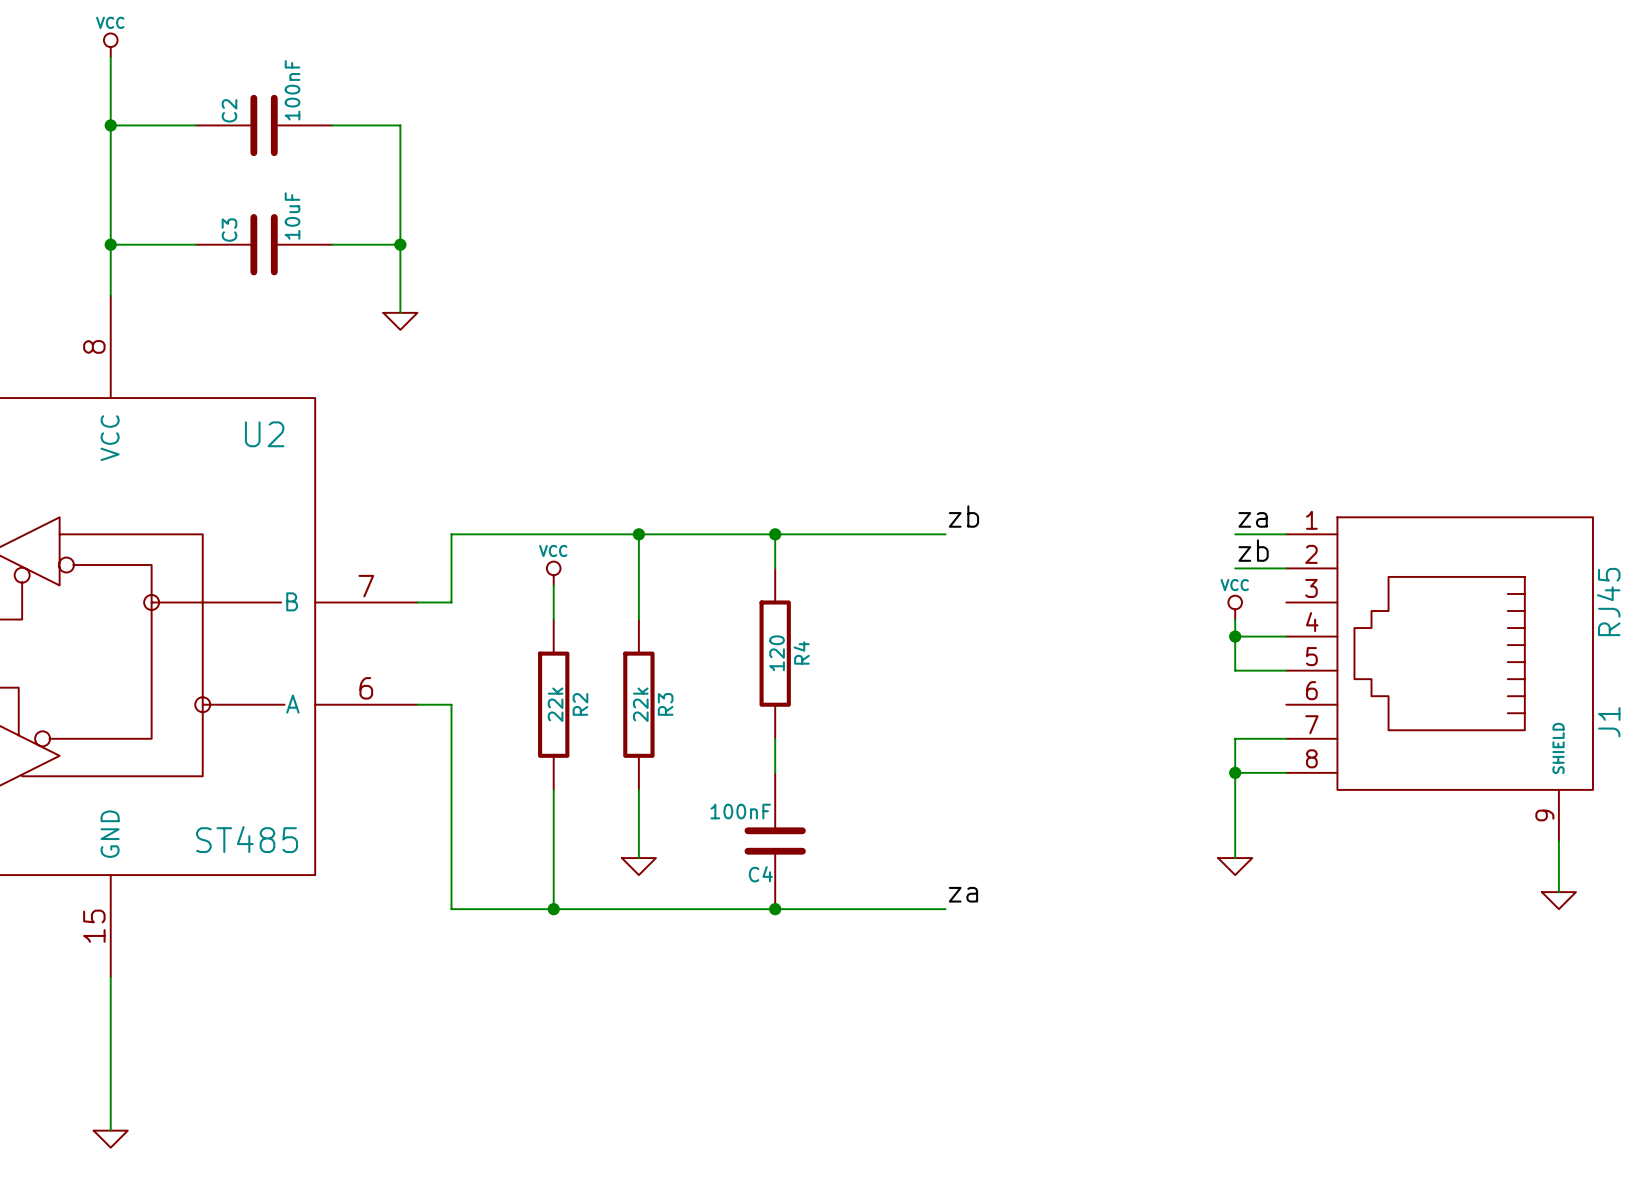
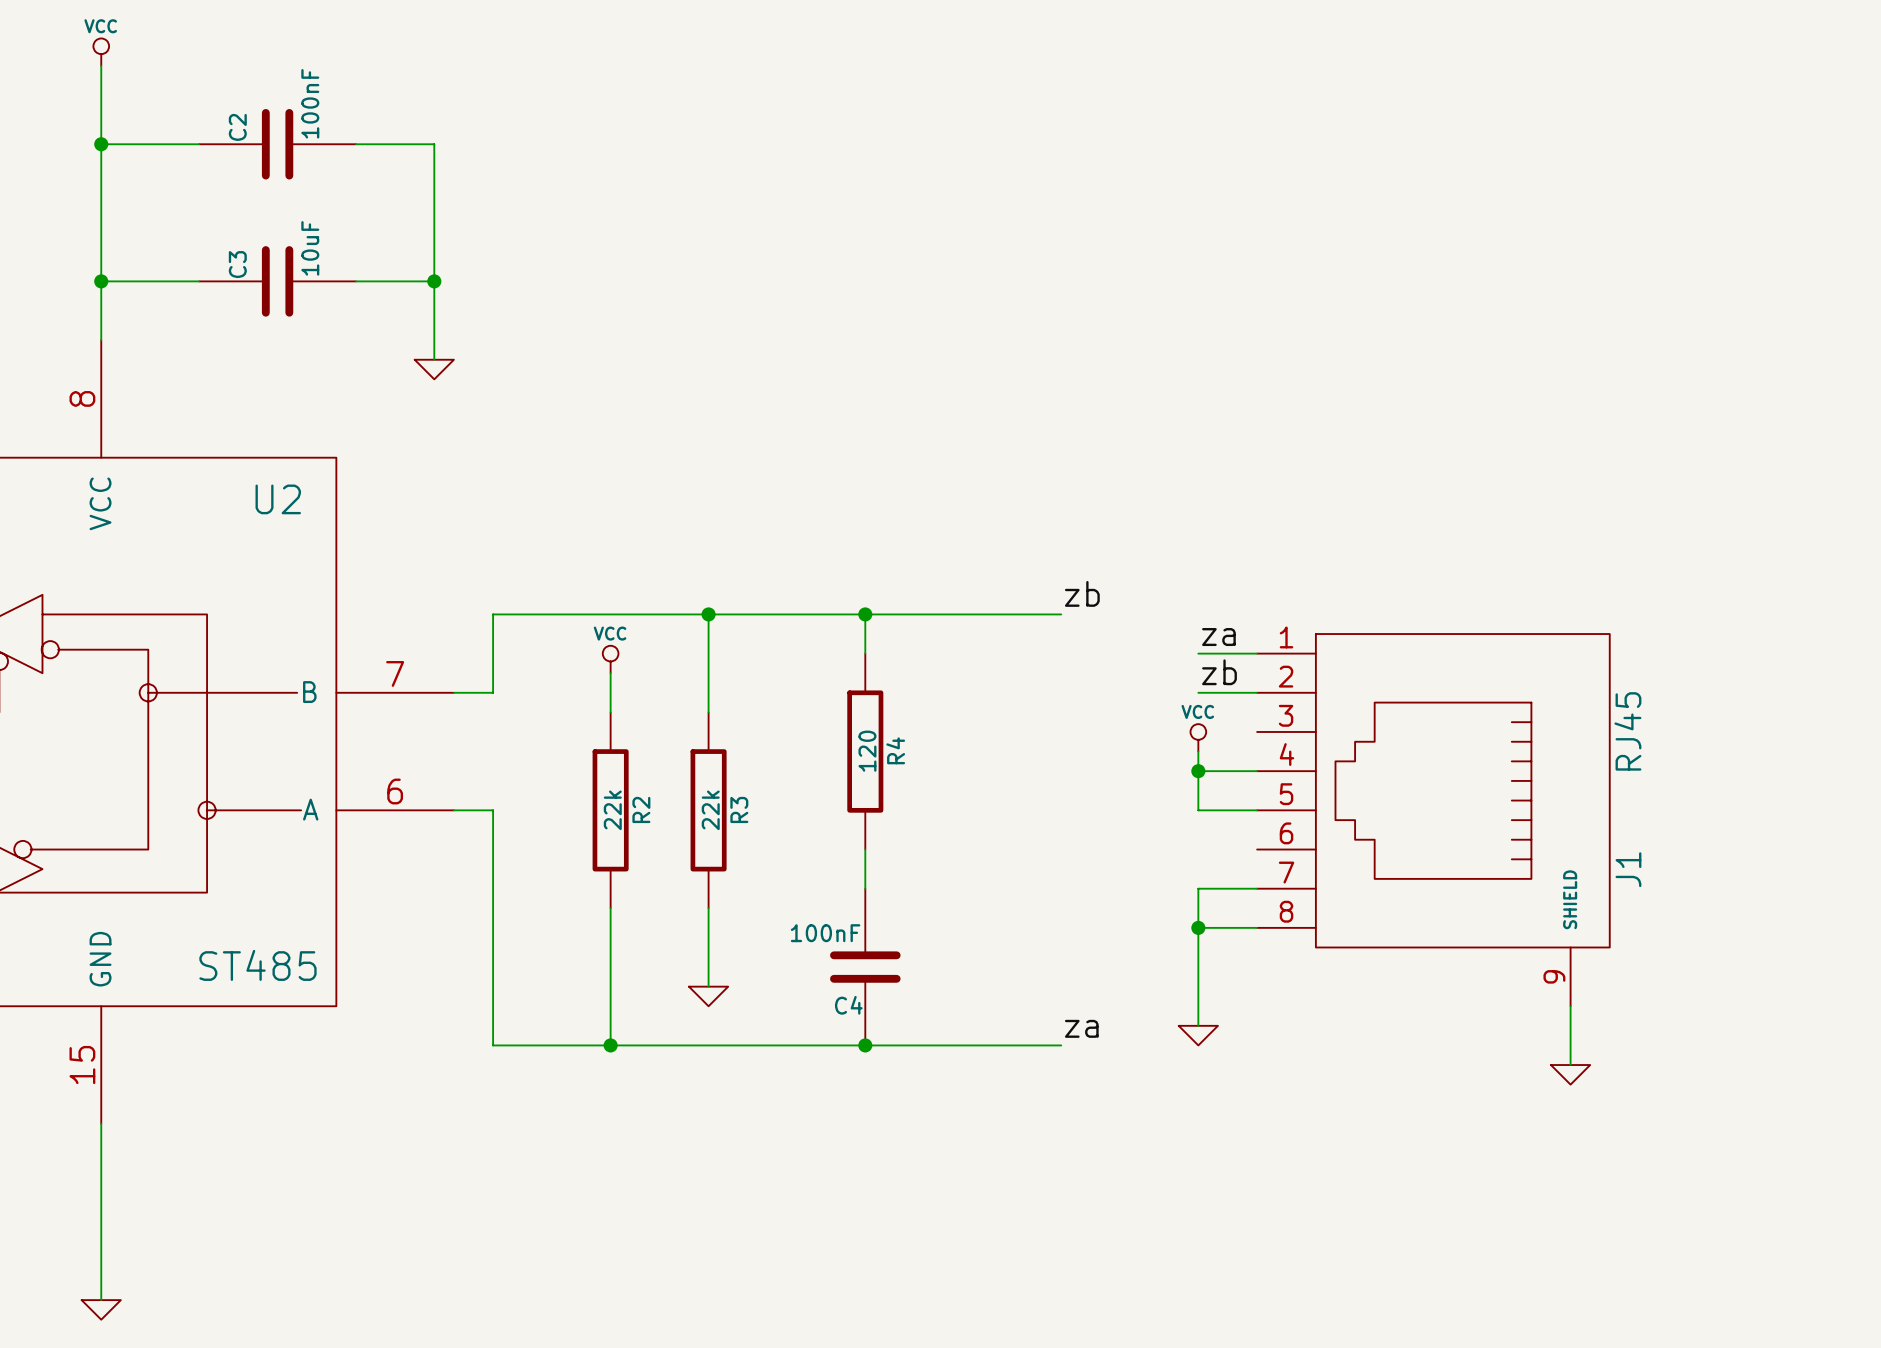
label position: za (1253, 519) -> za (1218, 637)
wire: (1235, 534) (1286, 534) -> (1198, 653) (1257, 653)
label position: zb (1253, 550) -> zb (1219, 672)
wire: (1235, 568) (1286, 568) -> (1198, 692) (1257, 692)
power symbol position: VCC (1235, 607) -> VCC (1198, 737)
wire: (1235, 619) (1235, 670) (1286, 670) -> (1198, 751) (1198, 810) (1257, 810)
wire: (1235, 636) (1286, 636) -> (1198, 771) (1257, 771)
junction: (1235, 636) -> none
junction: none -> (1198, 771)
J1 position: (1439, 679) -> (1433, 820)
wire: (1286, 738) (1235, 738) (1235, 858) -> (1257, 888) (1198, 888) (1198, 1025)
wire: (1235, 772) (1286, 772) -> (1198, 927) (1257, 927)
junction: (1235, 772) -> none
junction: none -> (1198, 927)
wire: (1558, 841) (1558, 892) -> (1570, 1006) (1570, 1065)
power symbol: (1235, 866) -> none
power symbol: none -> (1198, 1035)
power symbol: (1558, 900) -> none
power symbol: none -> (1570, 1074)

